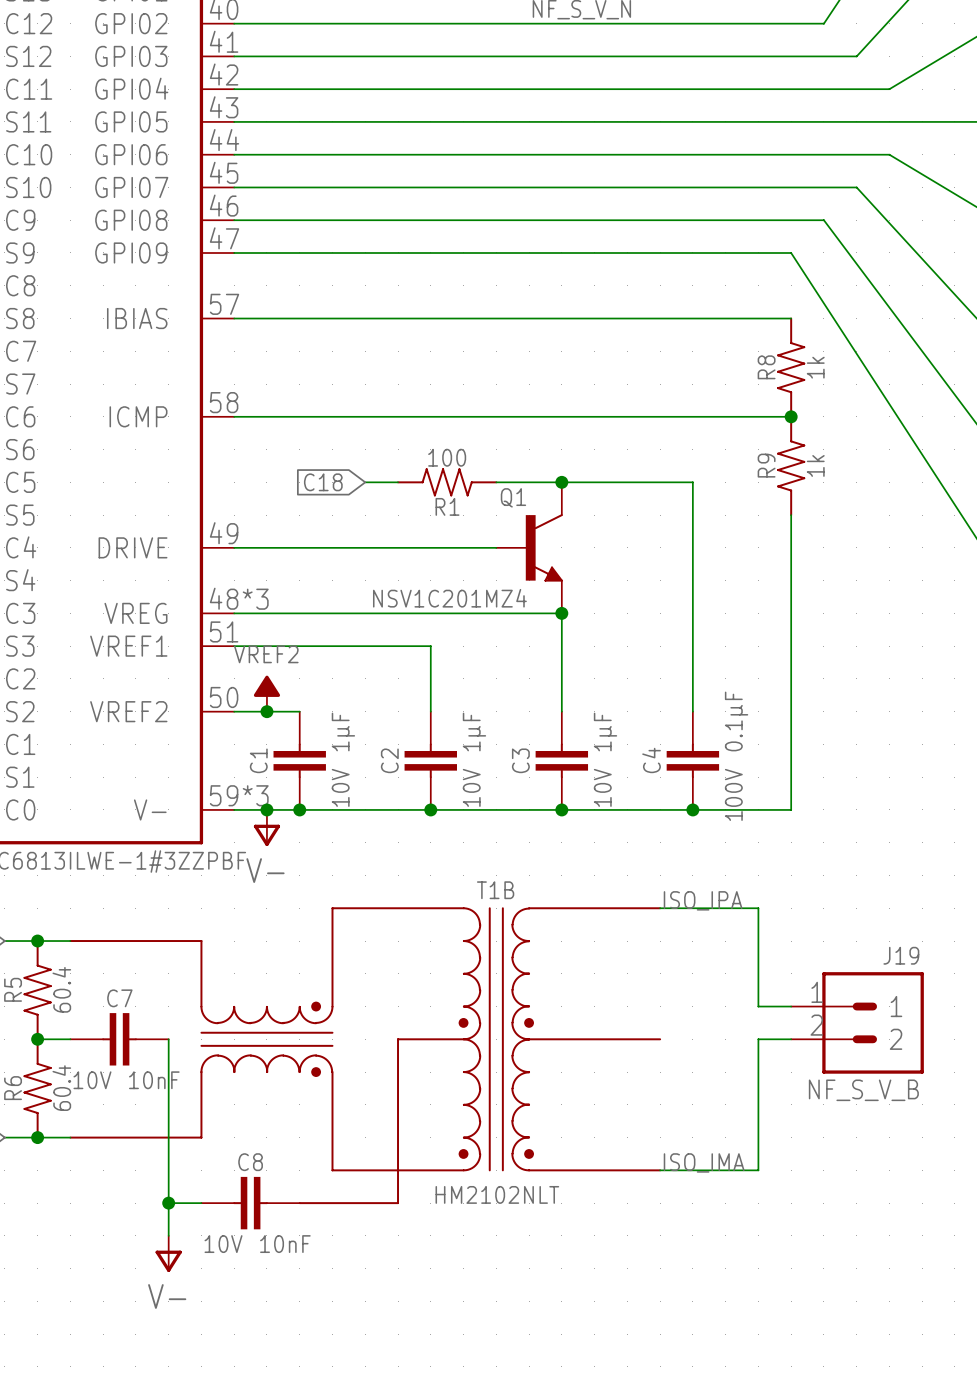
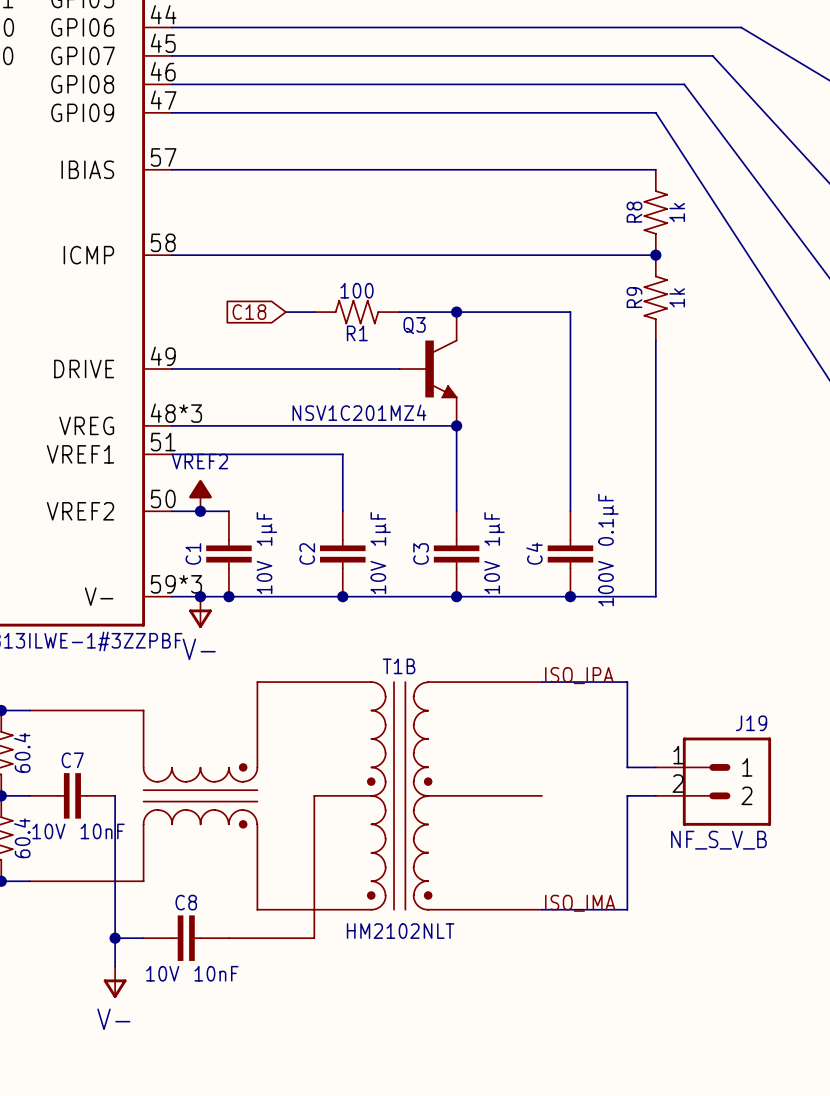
Q1 name: Q1 (513, 497) -> Q3 (414, 325)

